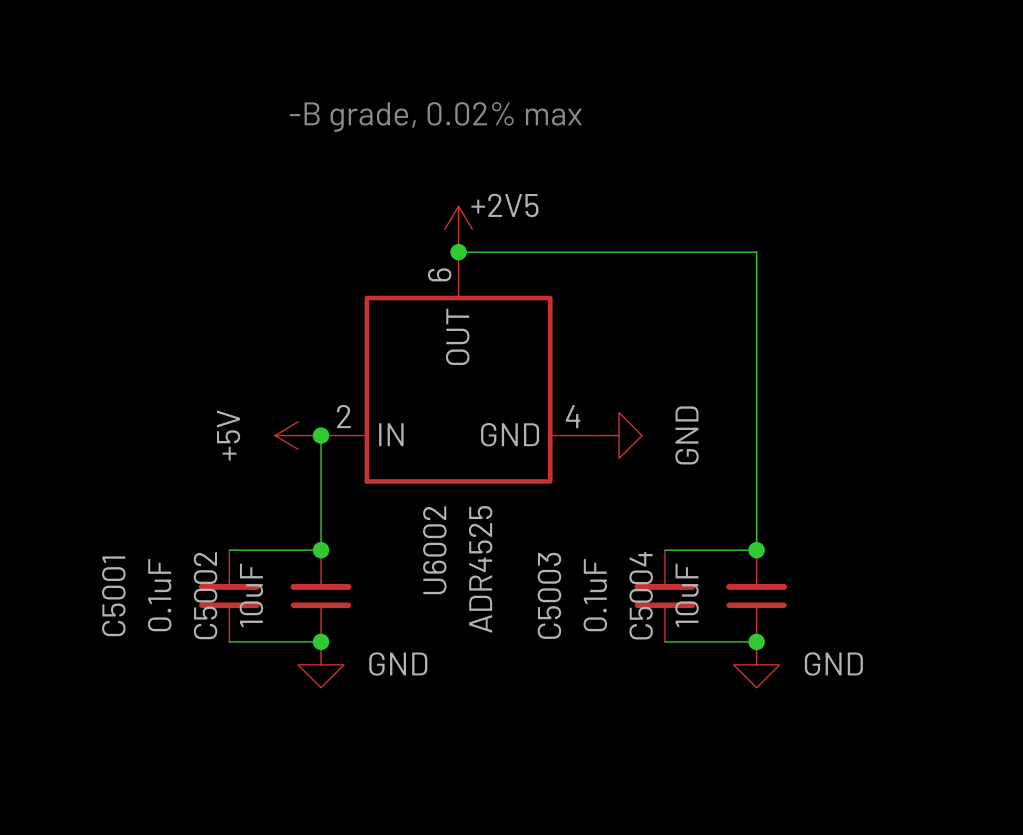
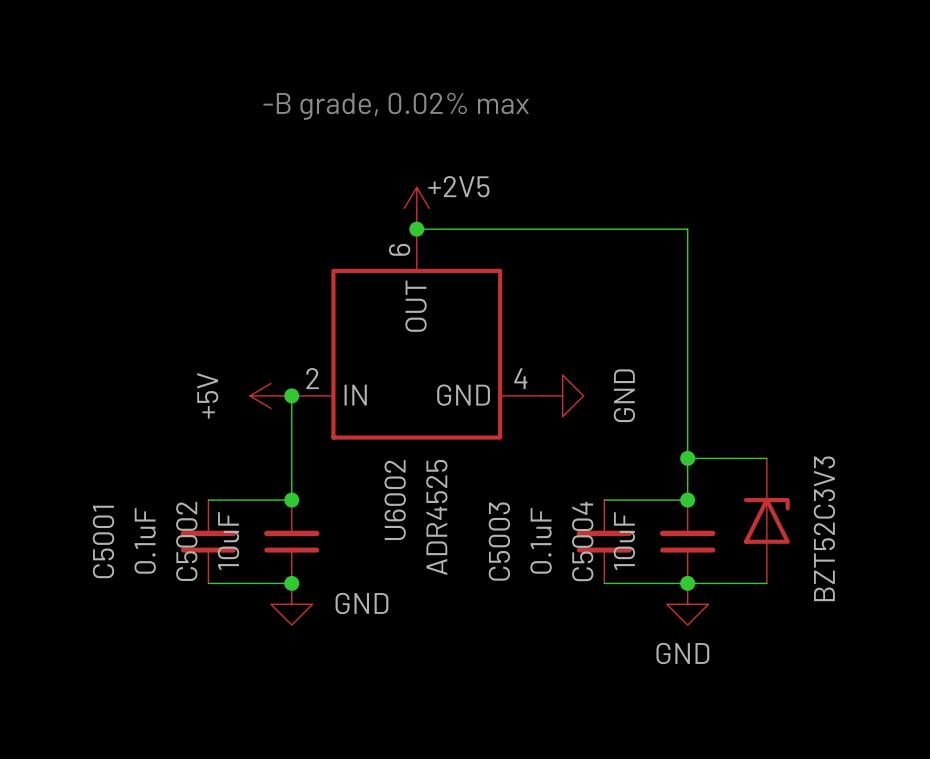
wire: none -> (687, 458) (766, 458)
junction: none -> (687, 458)
part: none -> BZT52C3V3 (766, 520)
wire: none -> (687, 579) (687, 583) (766, 583)
power symbol text position: GND (833, 663) -> GND (682, 653)

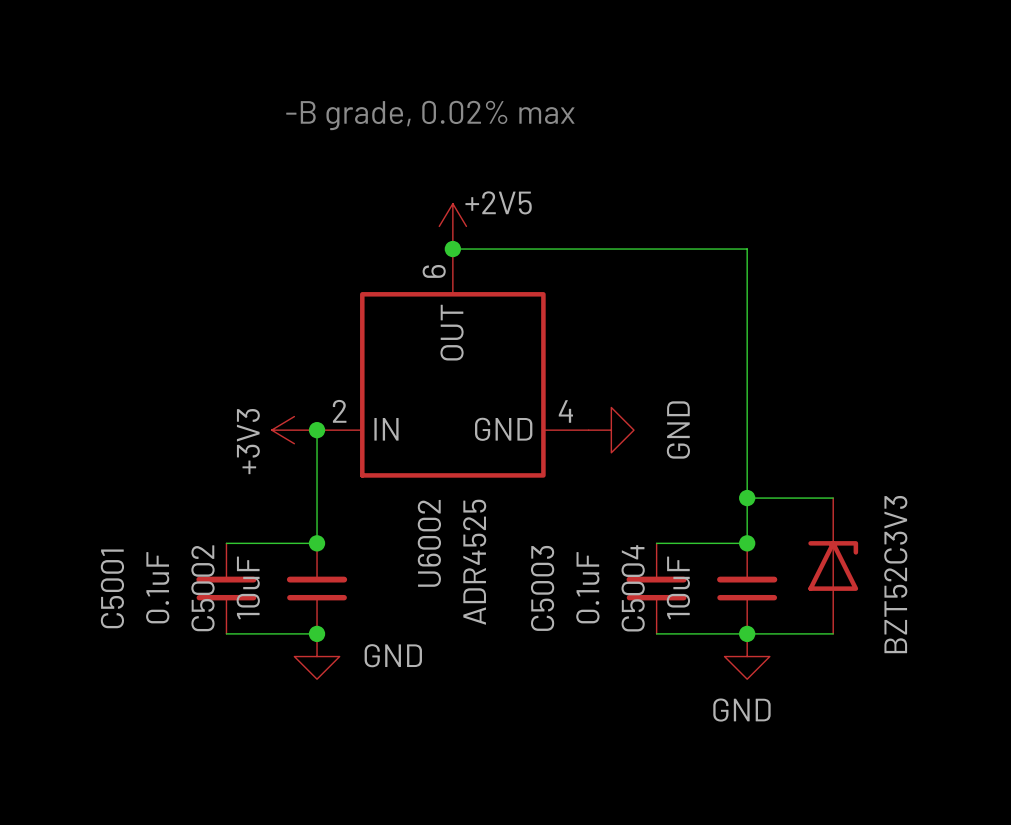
power symbol: +5V (270, 395) -> +3V3 (294, 430)

